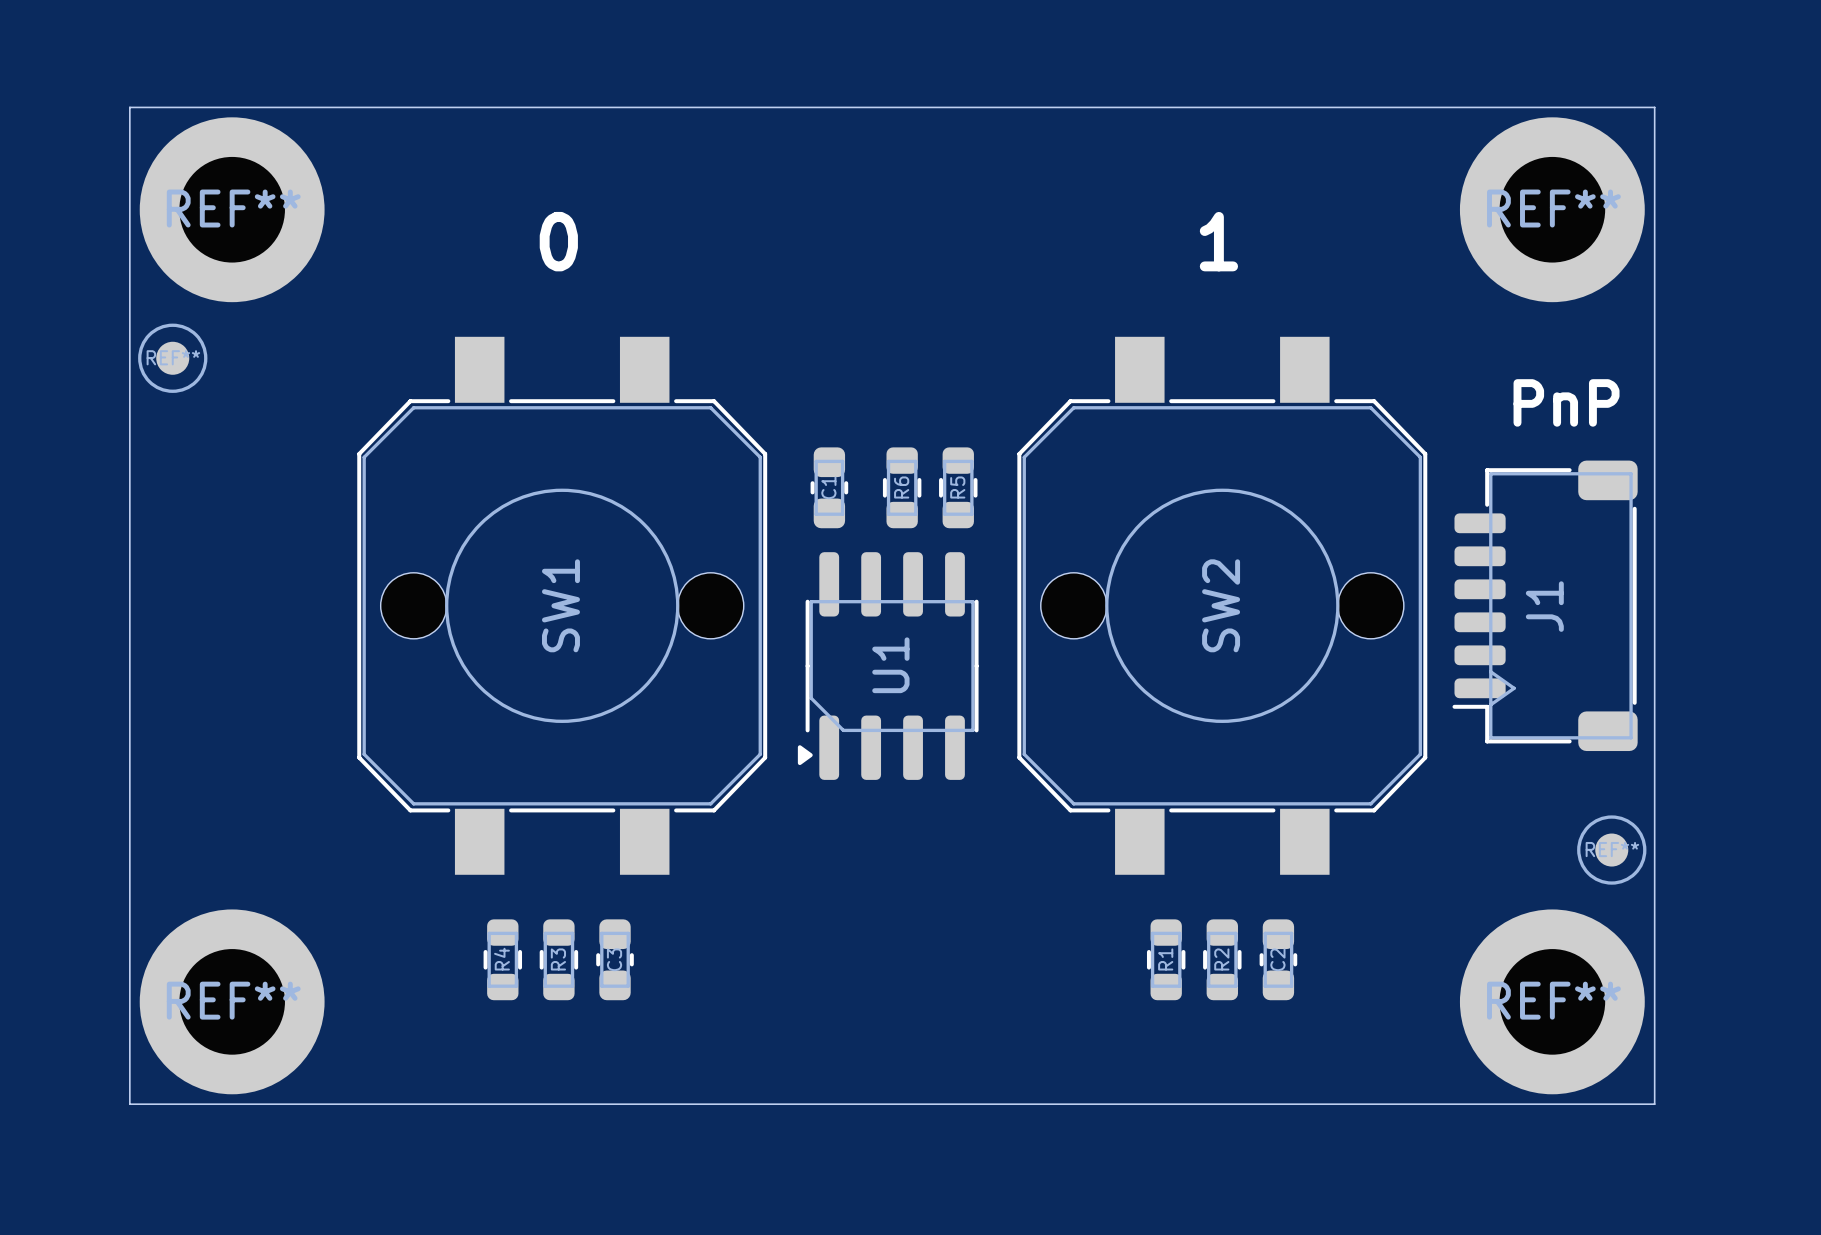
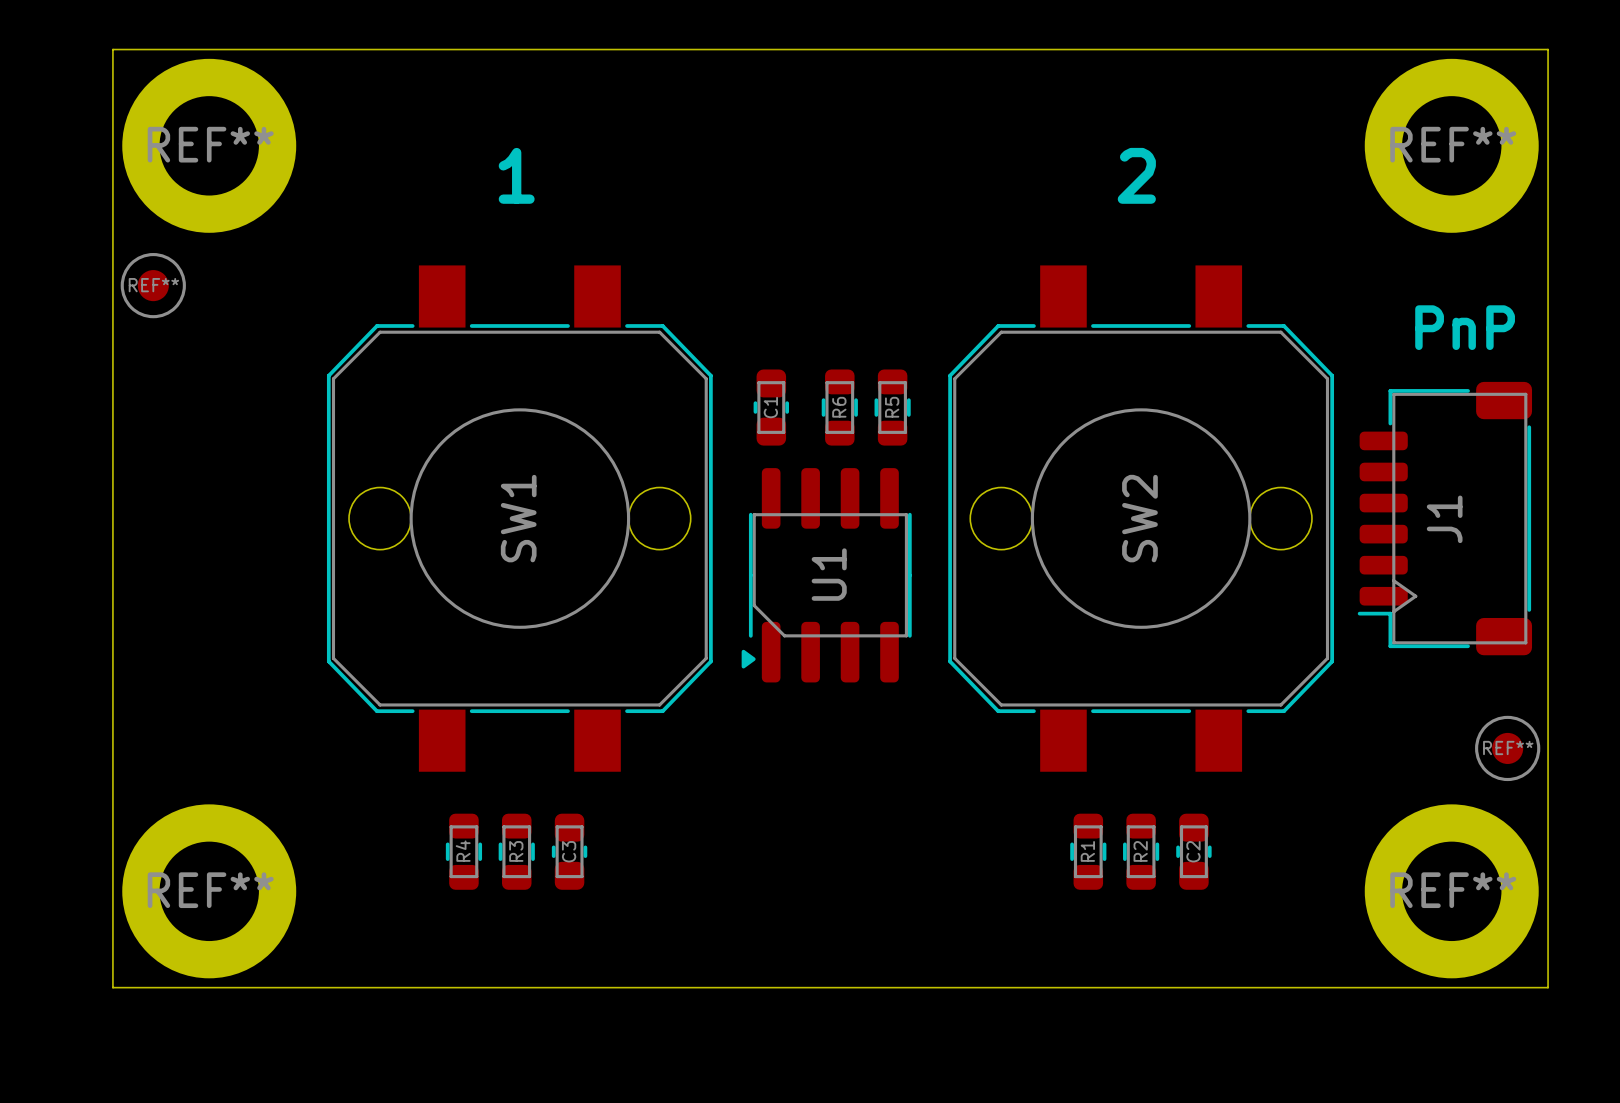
text: 0 (558, 241) -> 1 (516, 175)
text: 1 (1218, 241) -> 2 (1136, 175)

